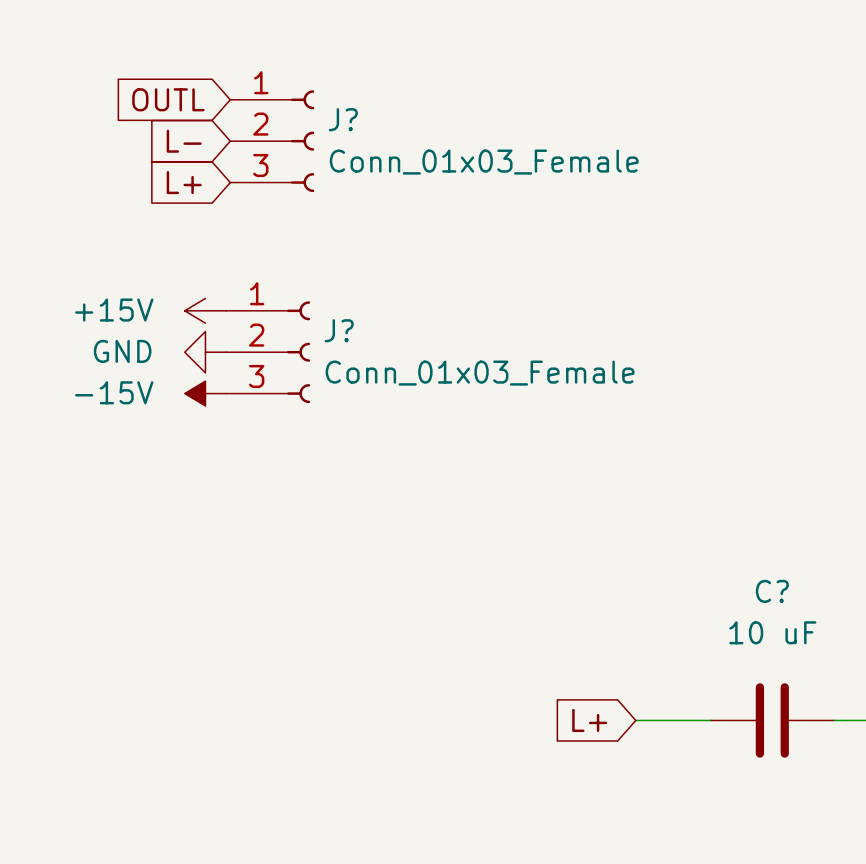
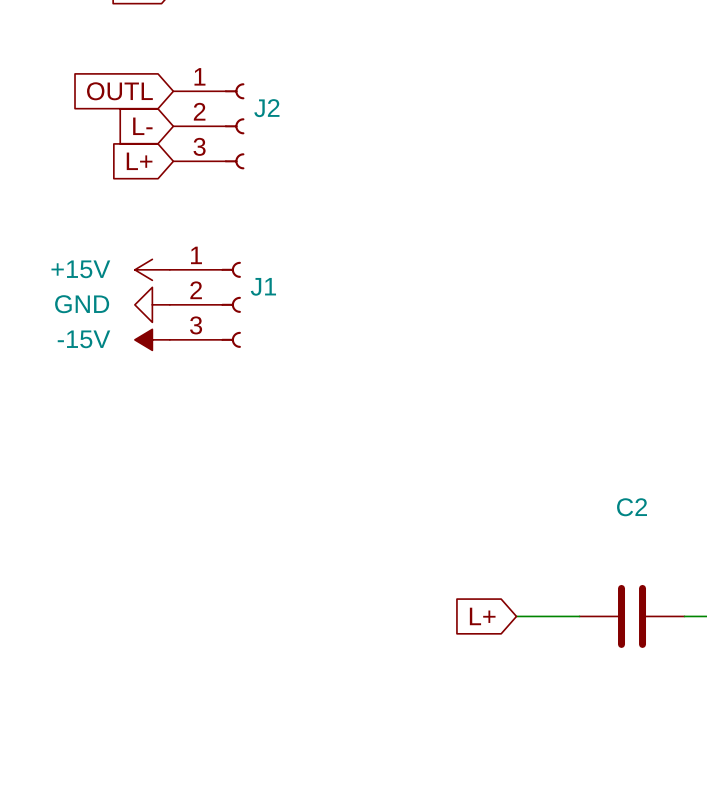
J? name: J? (343, 119) -> J2 (266, 108)
J? value: Conn_01x03_Female (484, 162) -> none
J? name: J? (339, 330) -> J1 (263, 286)
J? value: Conn_01x03_Female (480, 373) -> none
C? name: C? (772, 591) -> C2 (632, 507)
C? value: 10 uF (772, 632) -> none

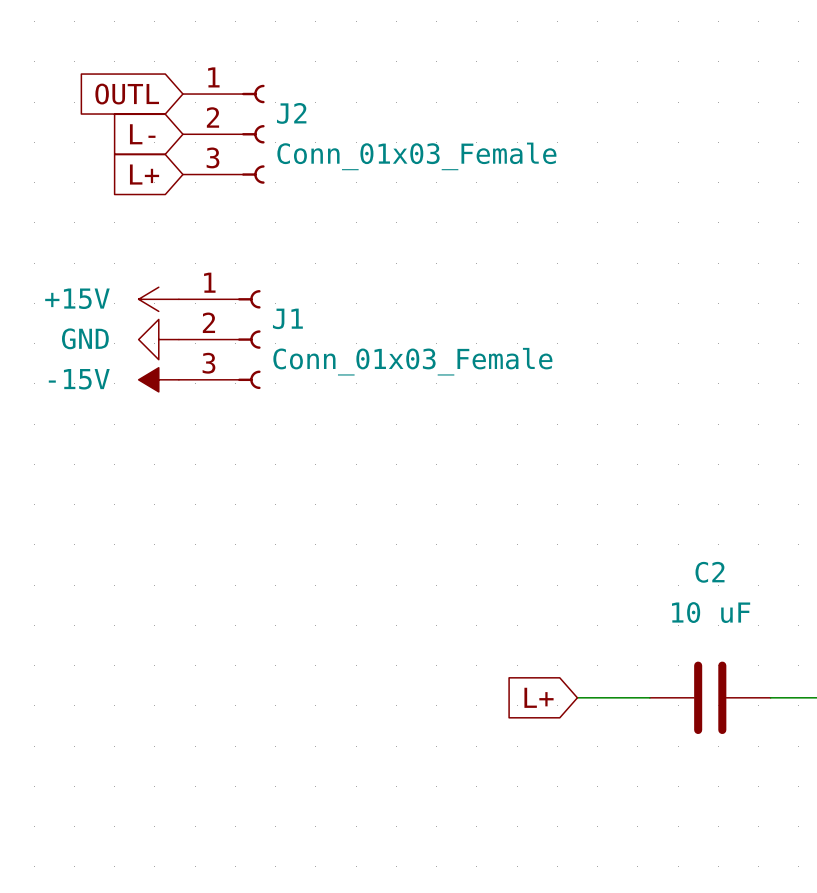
J2 value: none -> Conn_01x03_Female (416, 156)
J1 value: none -> Conn_01x03_Female (412, 361)
C2 value: none -> 10 uF (711, 612)

